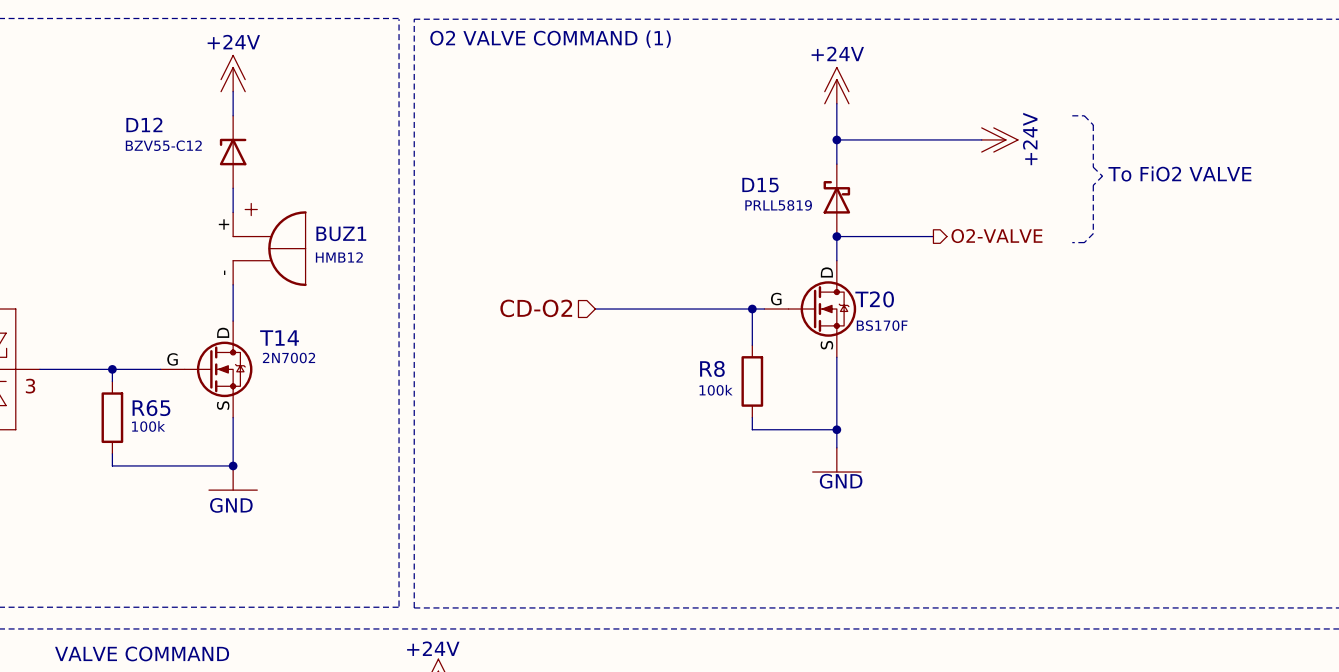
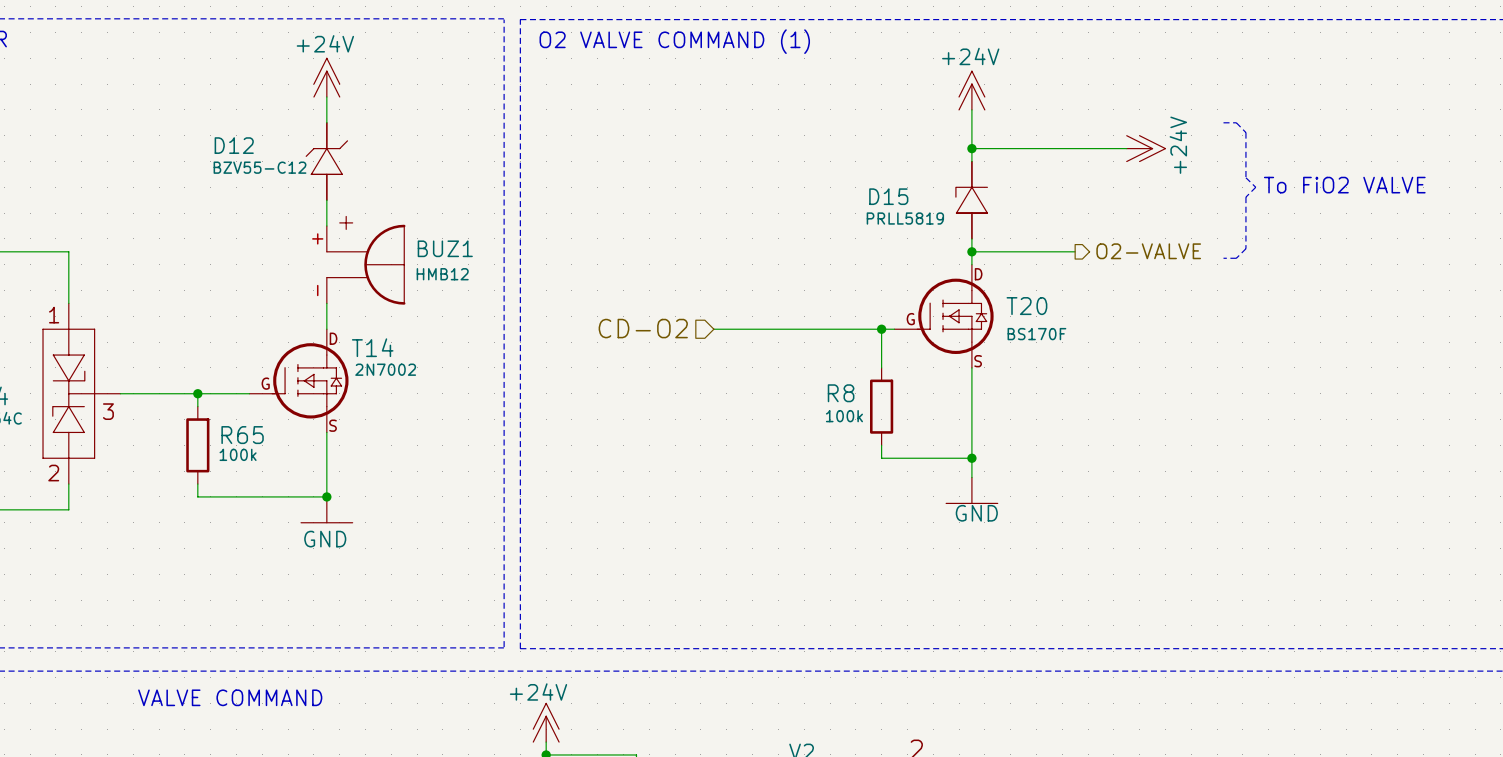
D12 symbol: [219, 115, 247, 189] -> [306, 122, 348, 201]
D15 symbol: [823, 164, 851, 237] -> [955, 161, 988, 239]
T20 symbol: [764, 260, 857, 358] -> [894, 264, 994, 368]
T14 symbol: [160, 321, 253, 418] -> [249, 329, 349, 433]

